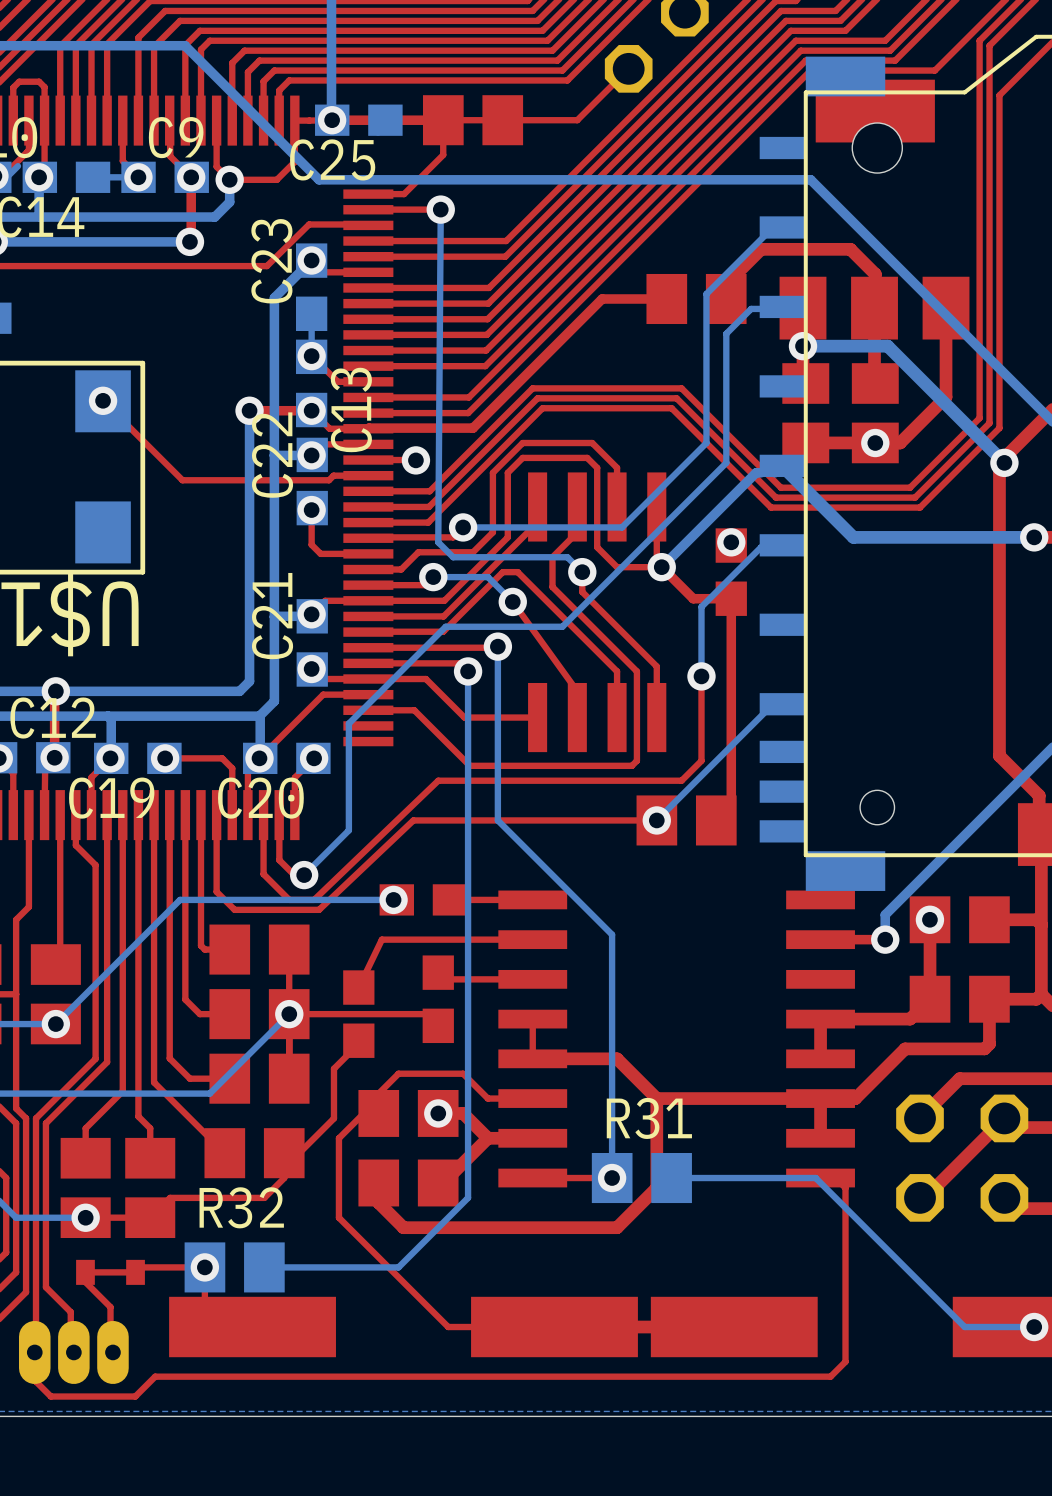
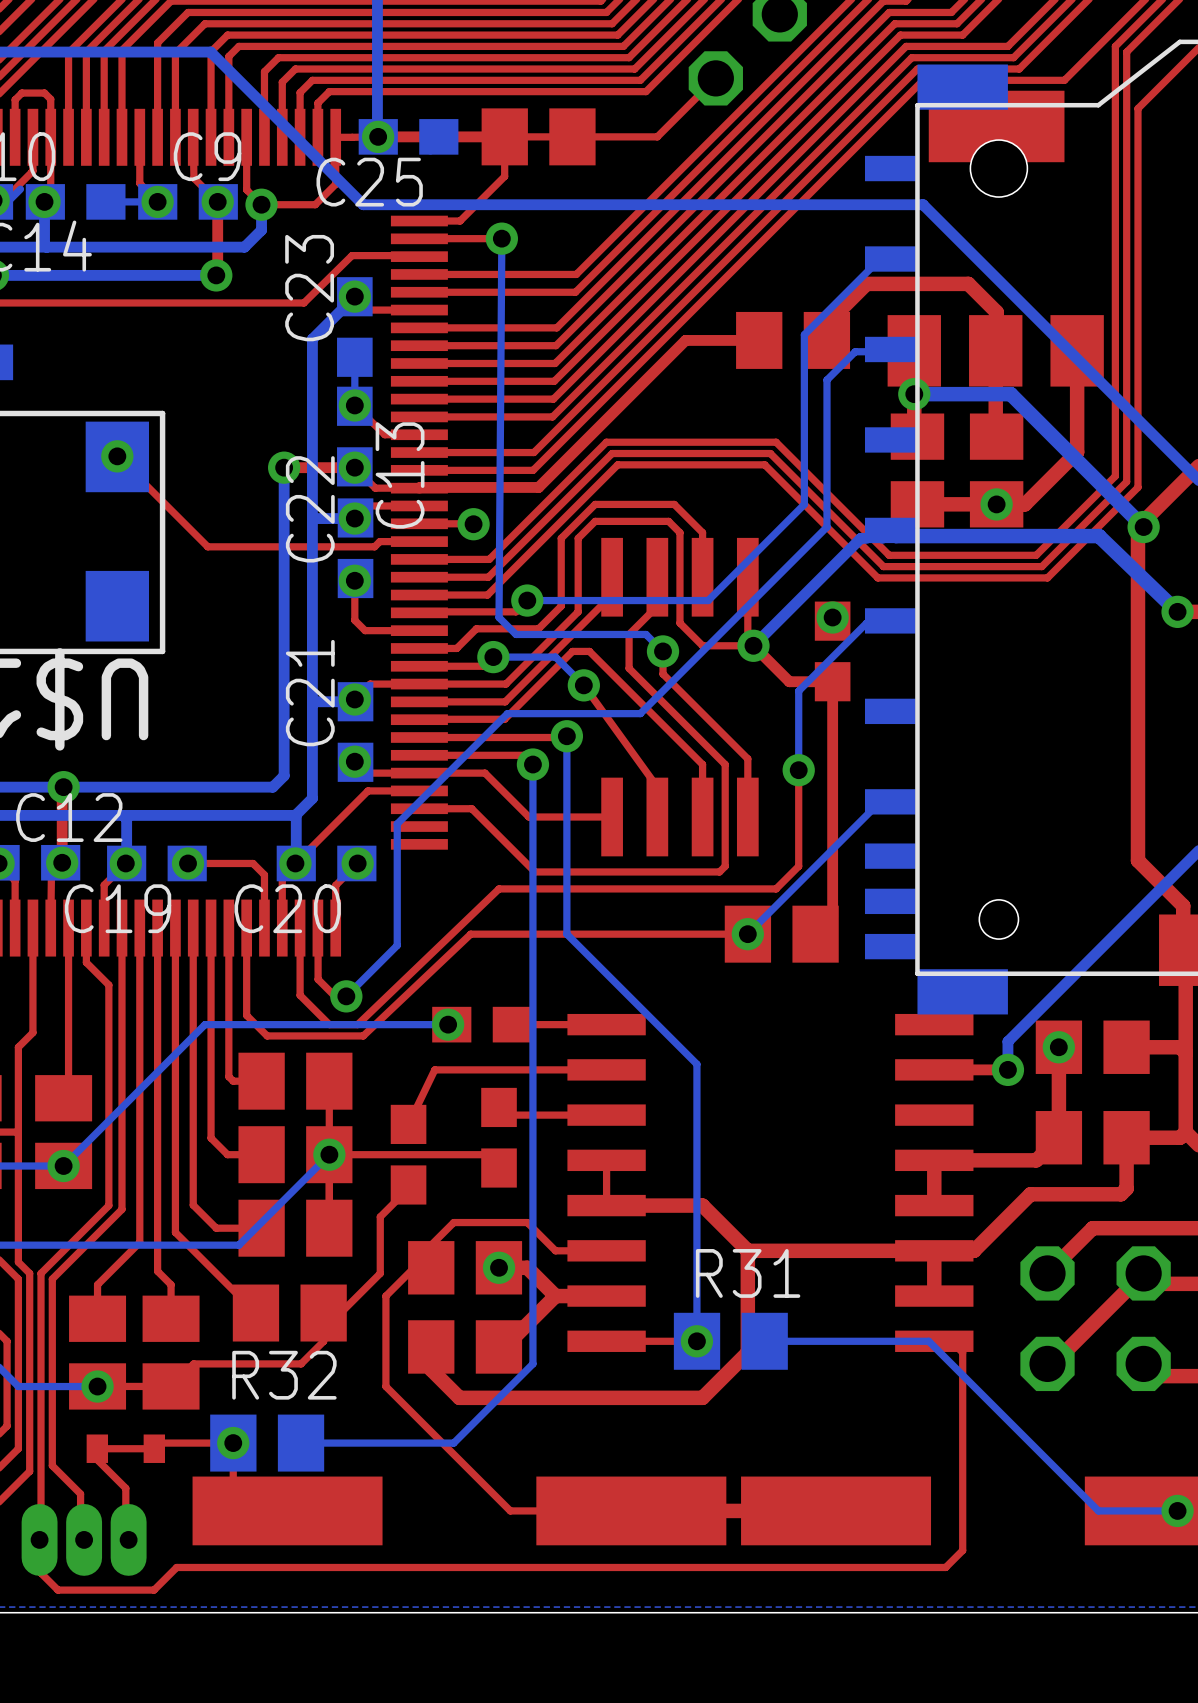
bottom track: (786, 470) (853, 537) (1034, 537) -> (895, 536) (1098, 536) (1177, 611)

